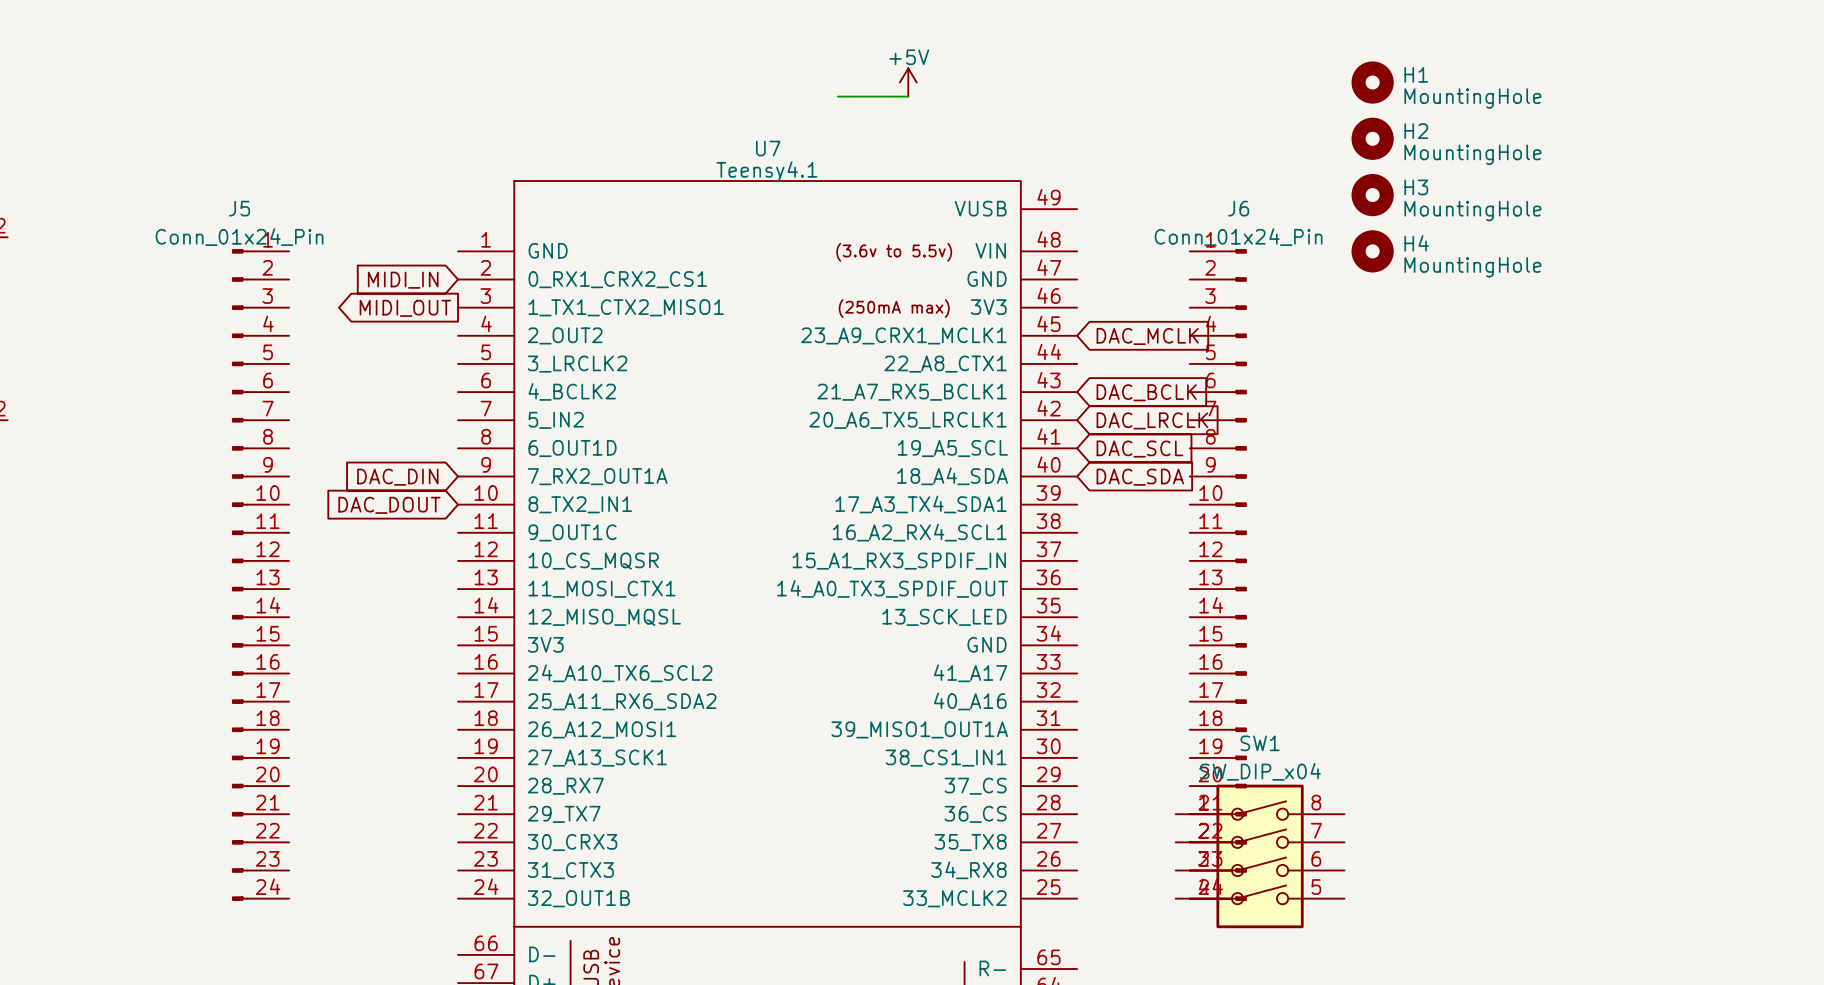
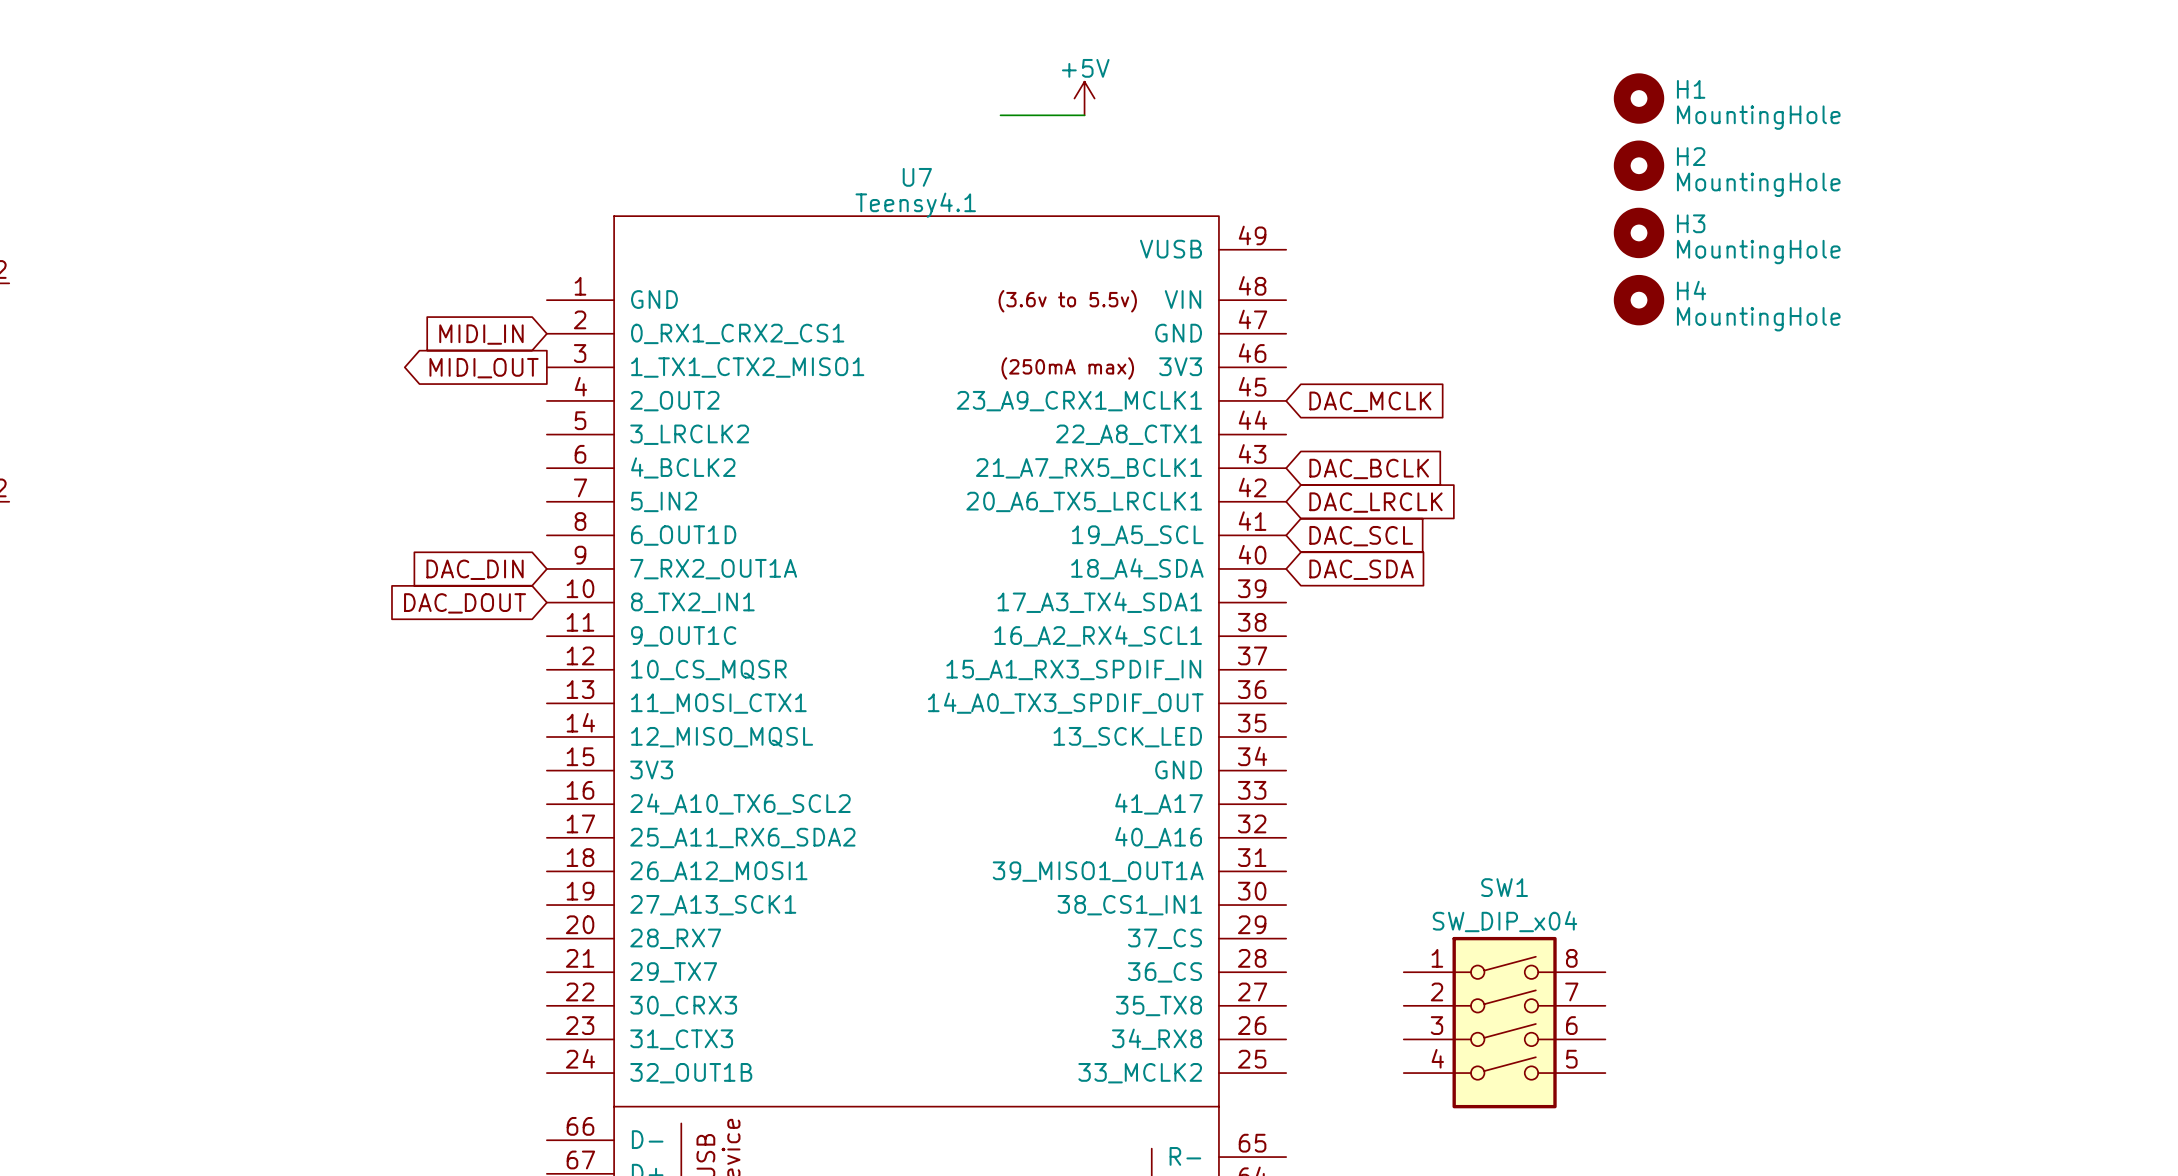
J5: Conn_01x24_Pin (260, 575) -> none
J6: Conn_01x24_Pin (1218, 575) -> none

